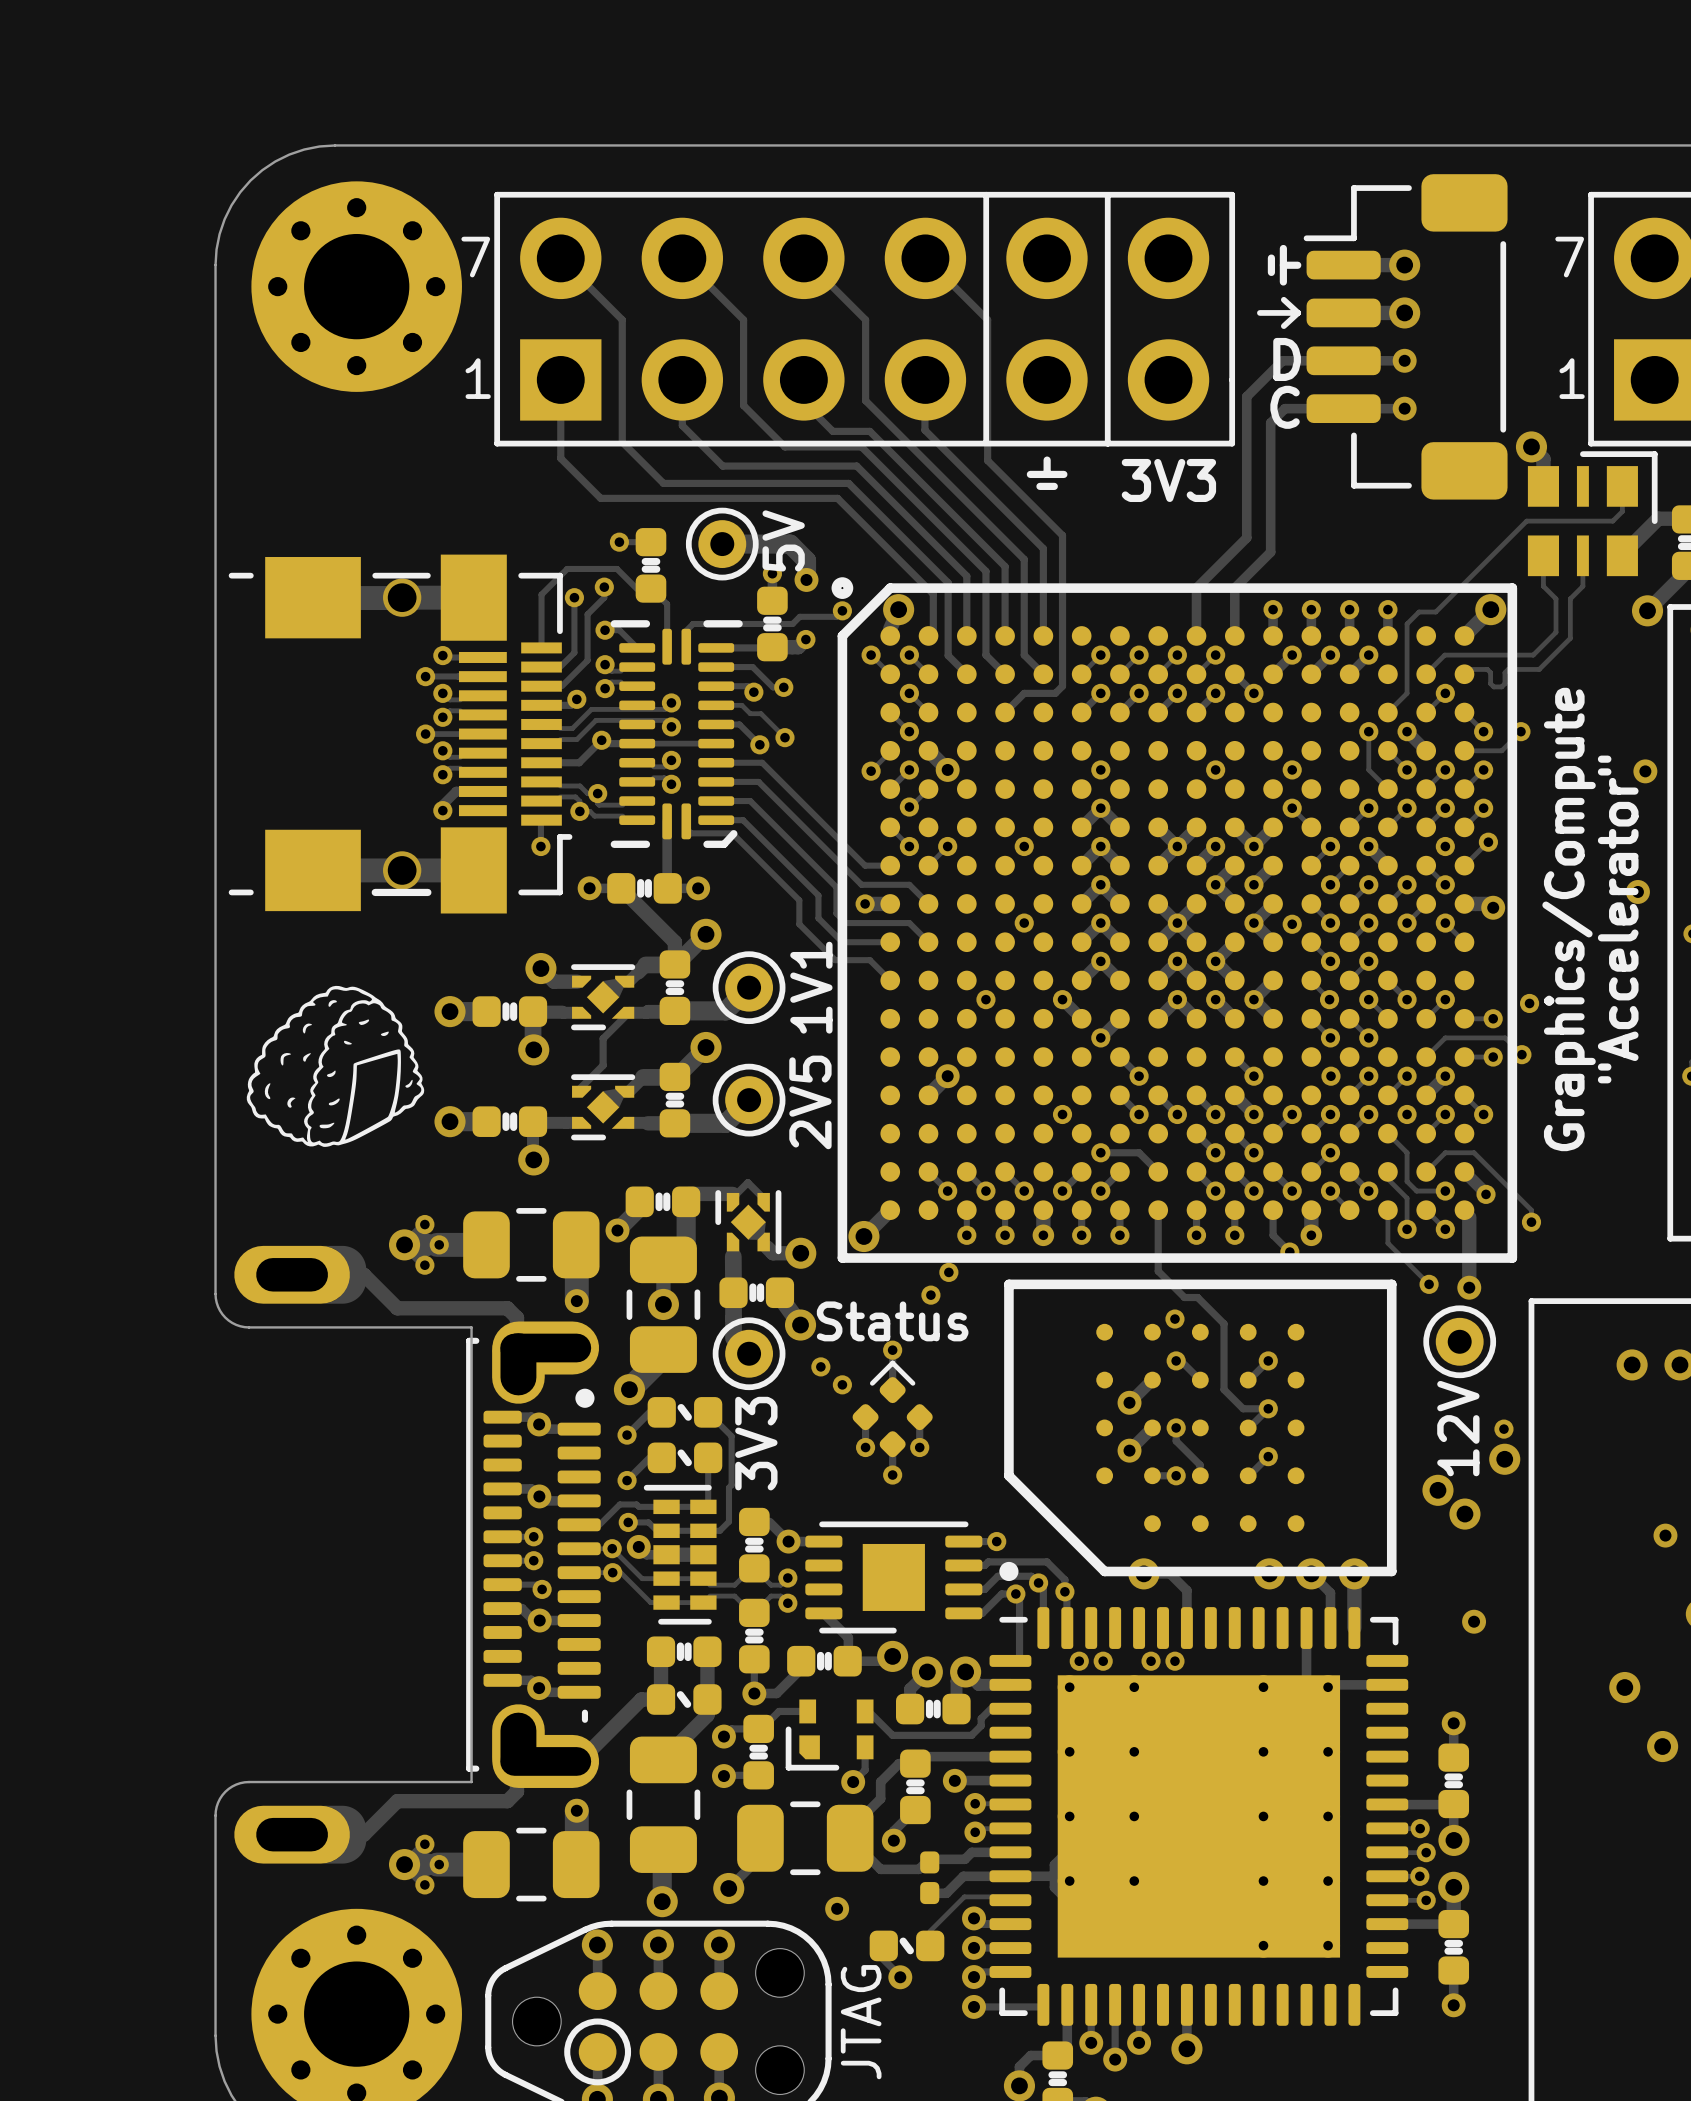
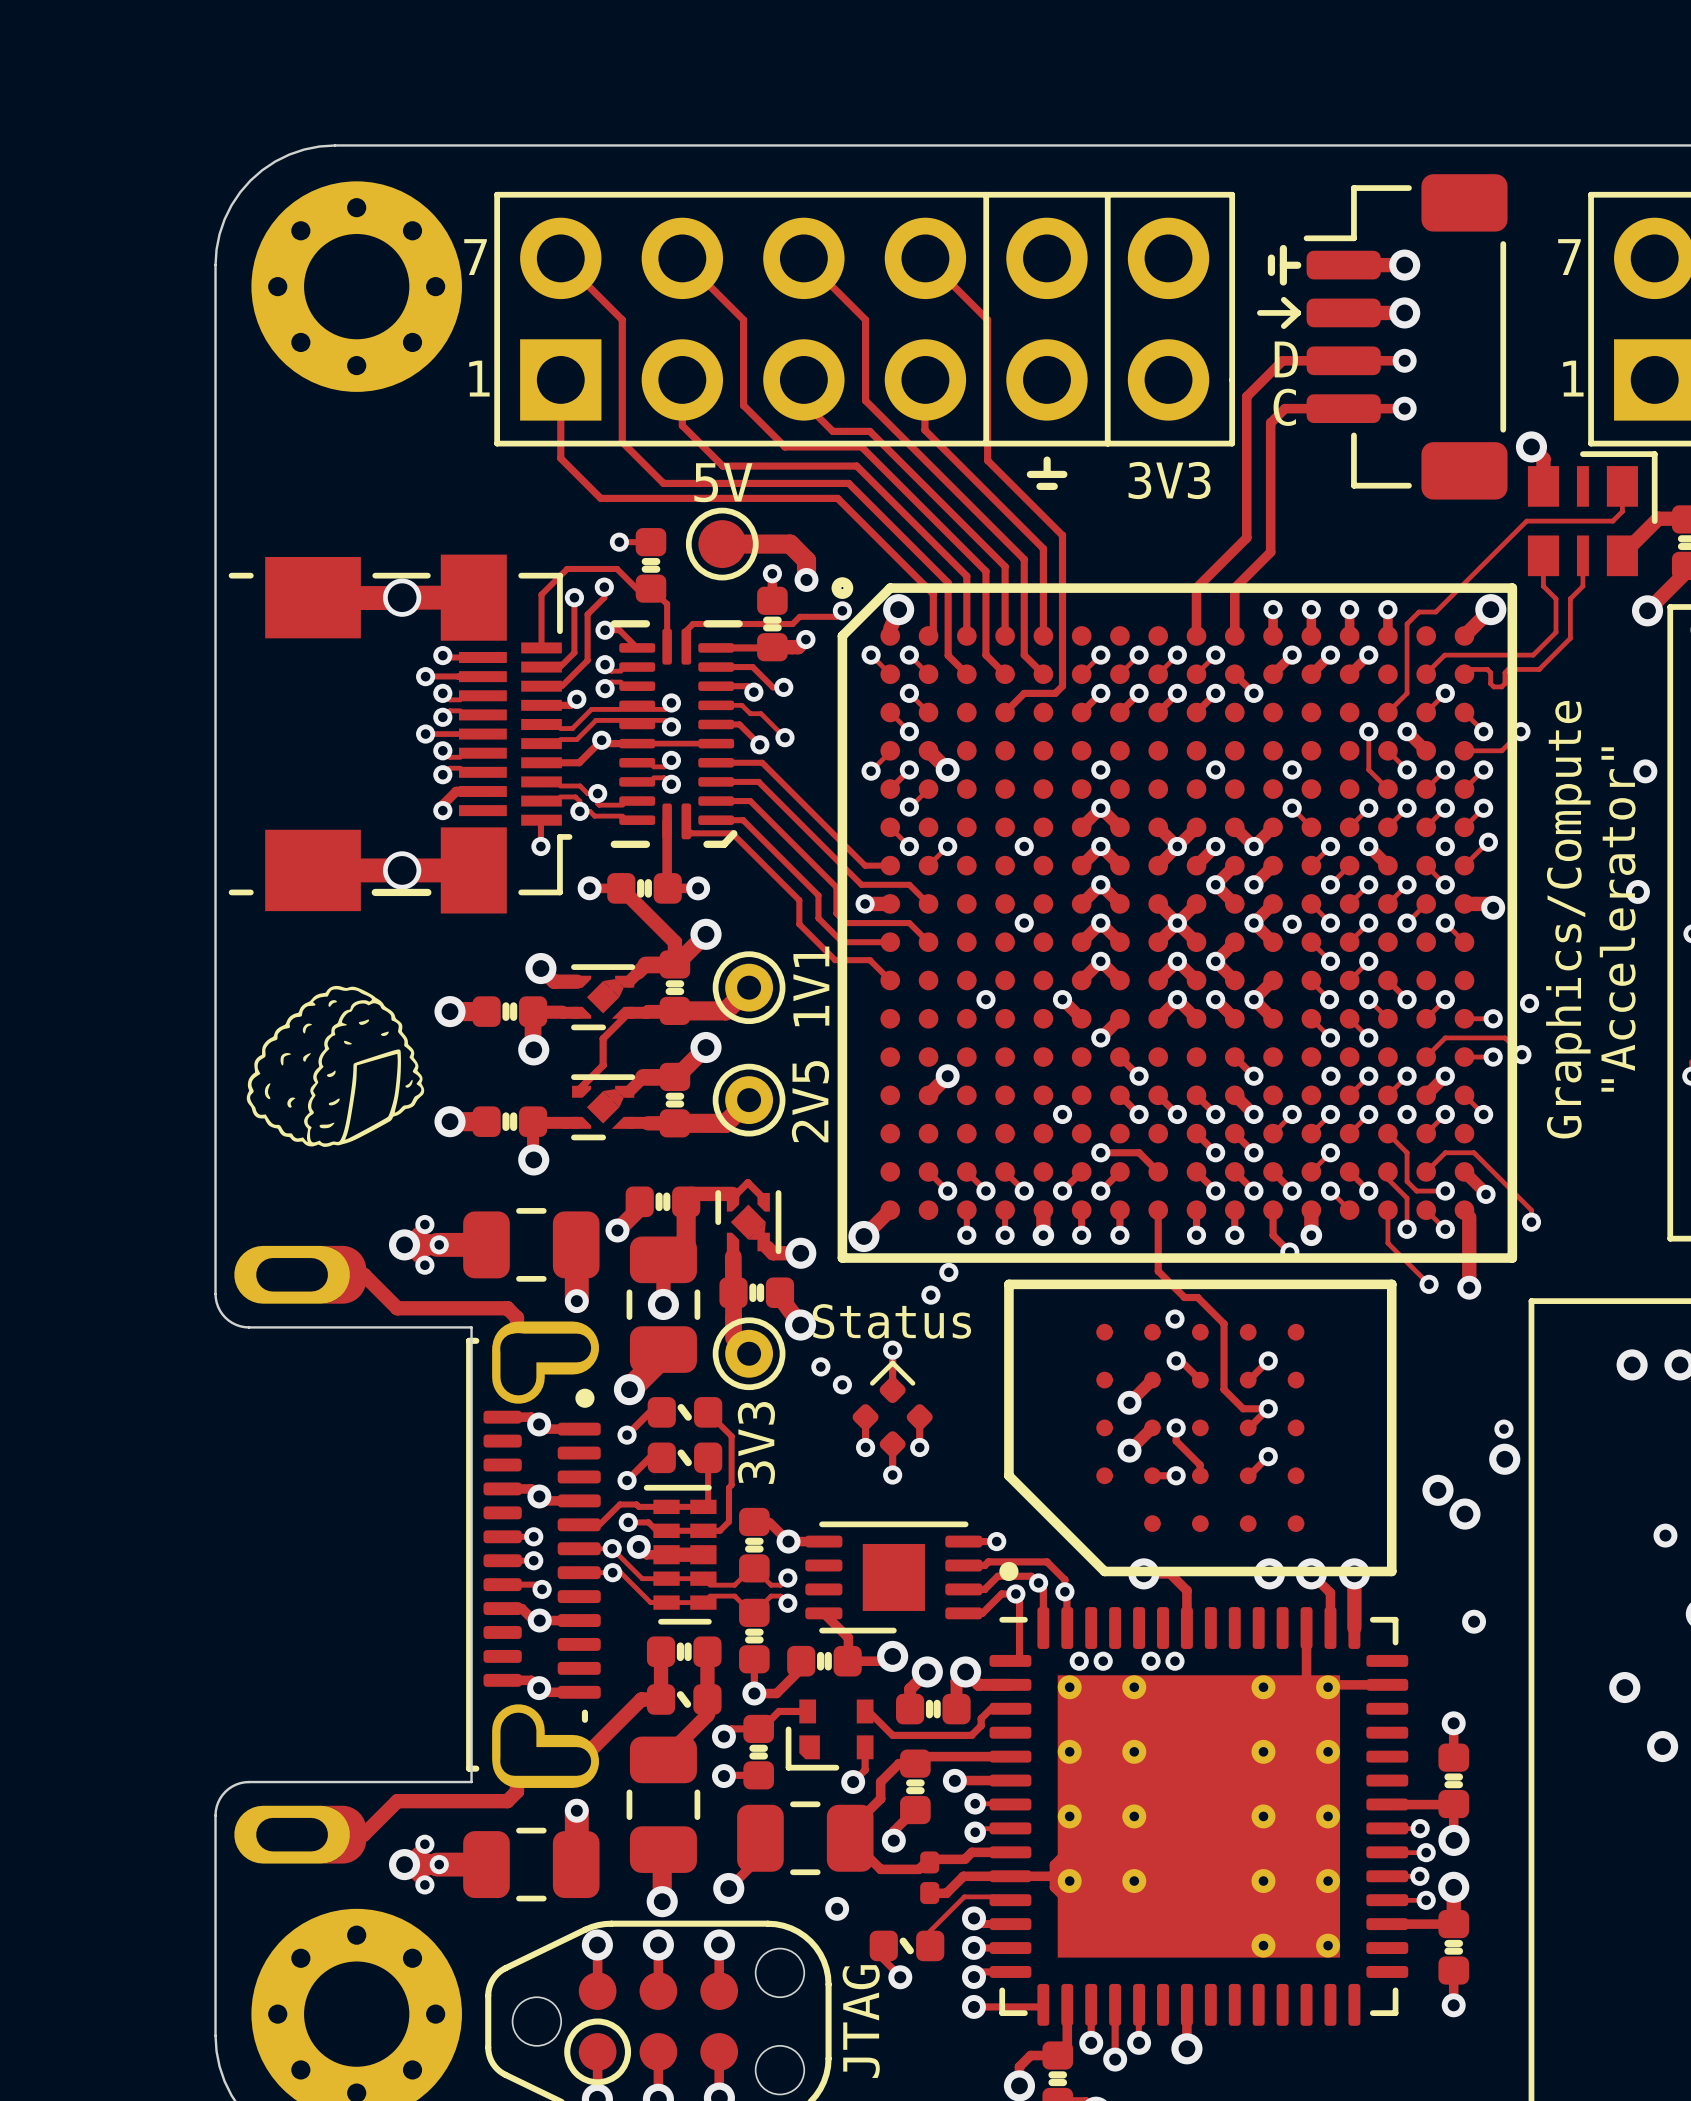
part footprint: [685, 507, 759, 581] -> [685, 507, 759, 581]
text rotation: 0° (783, 540) -> 90° clockwise (723, 482)
part: (1459, 1341) -> none
text: 12V (1458, 1428) -> none

